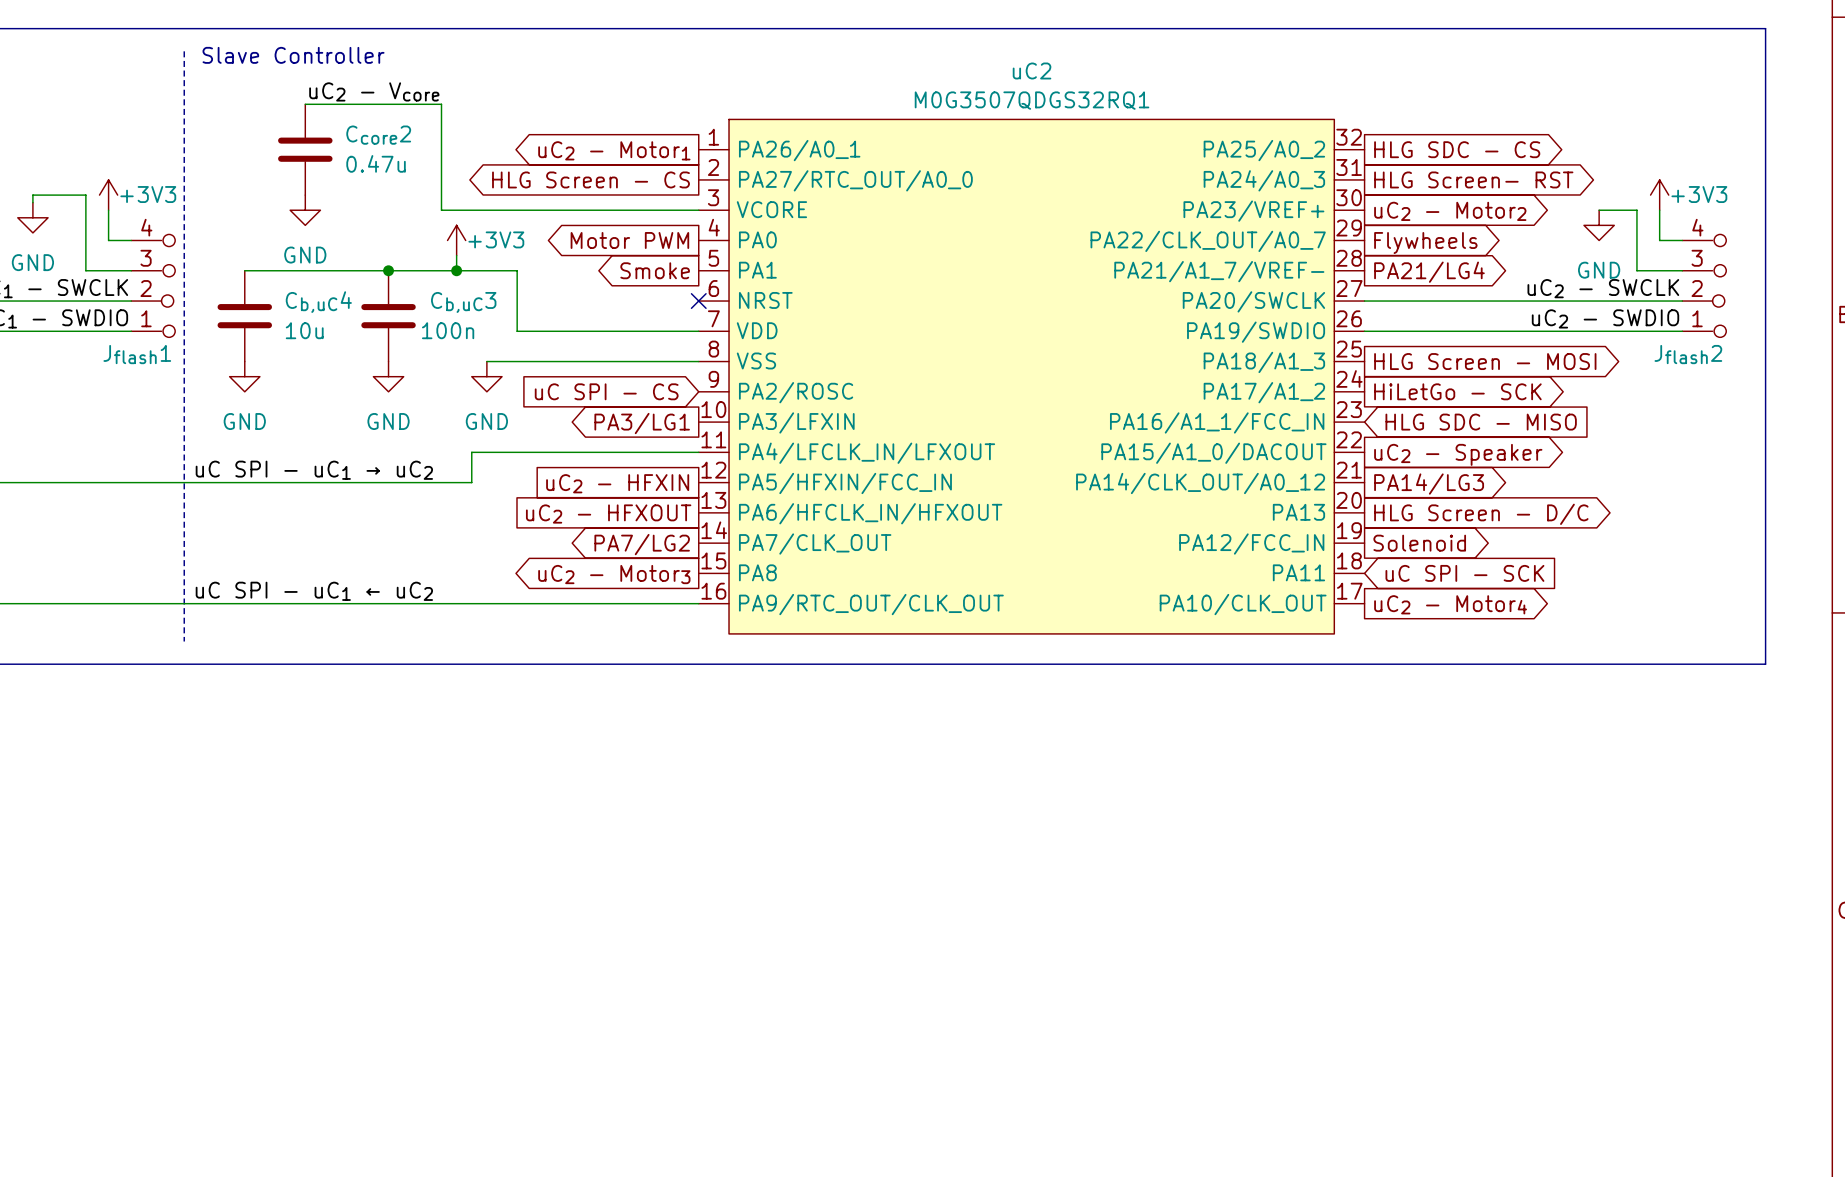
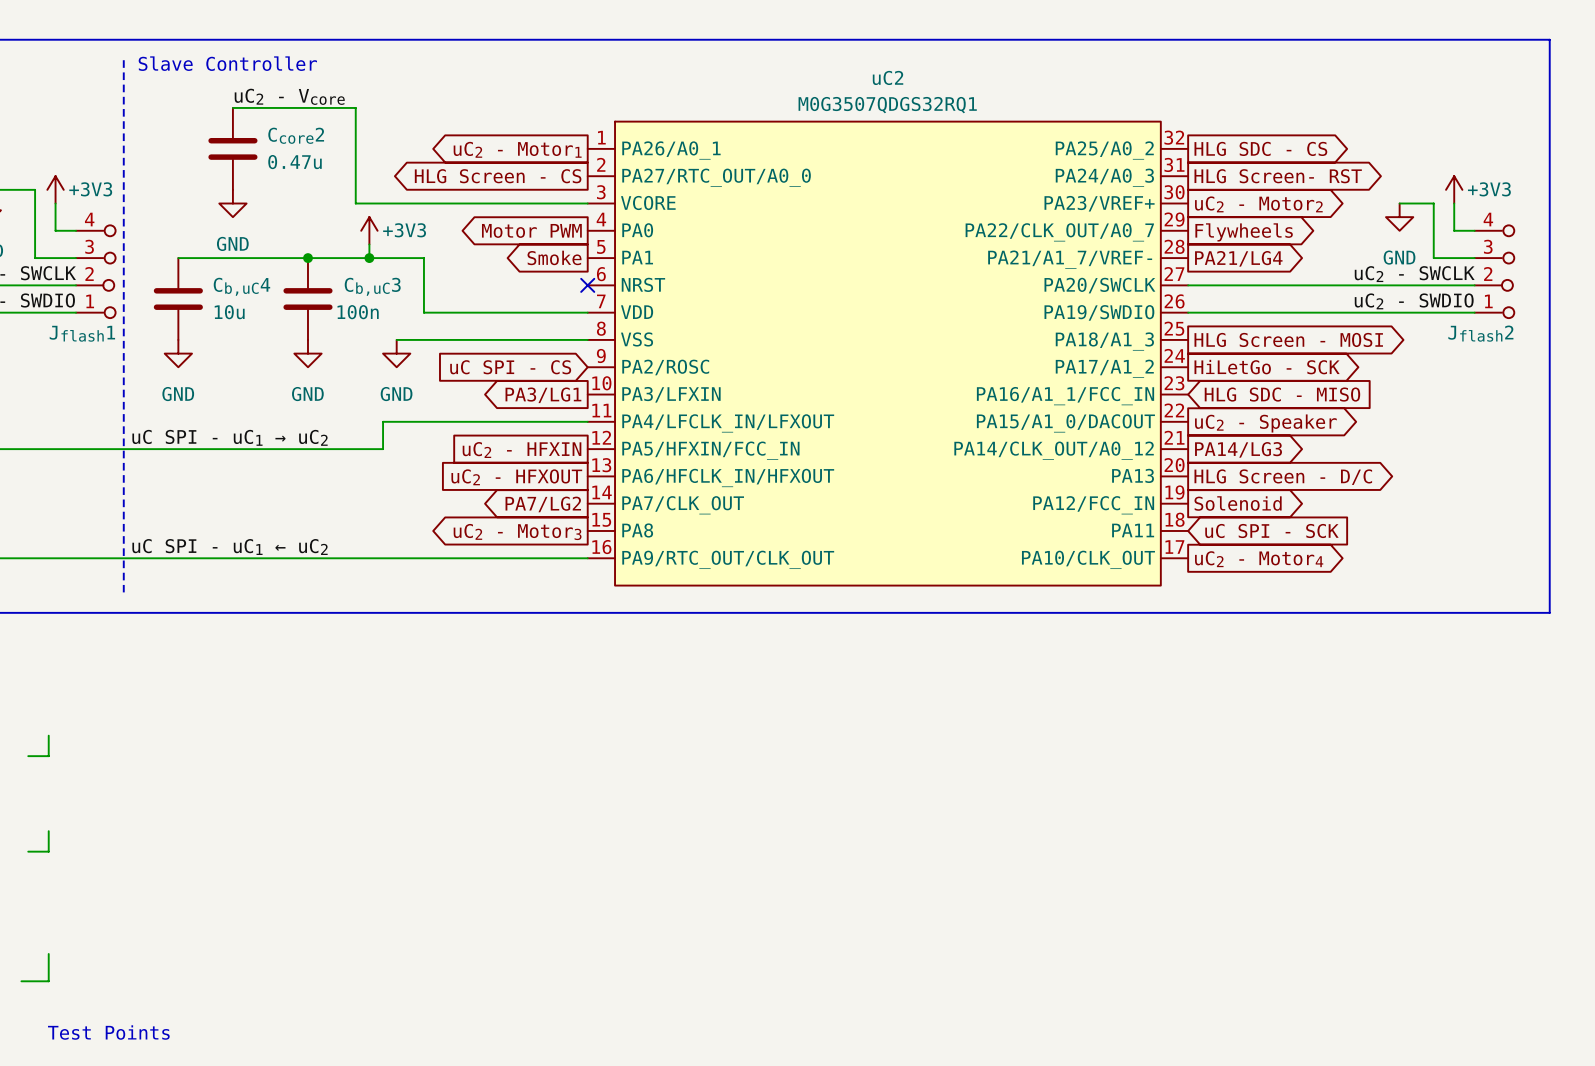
wire: none -> (48, 735) (48, 756) (28, 756)
wire: none -> (48, 831) (48, 851) (28, 851)
wire: none -> (48, 954) (48, 981) (21, 981)
text: none -> Test Points (108, 1032)

